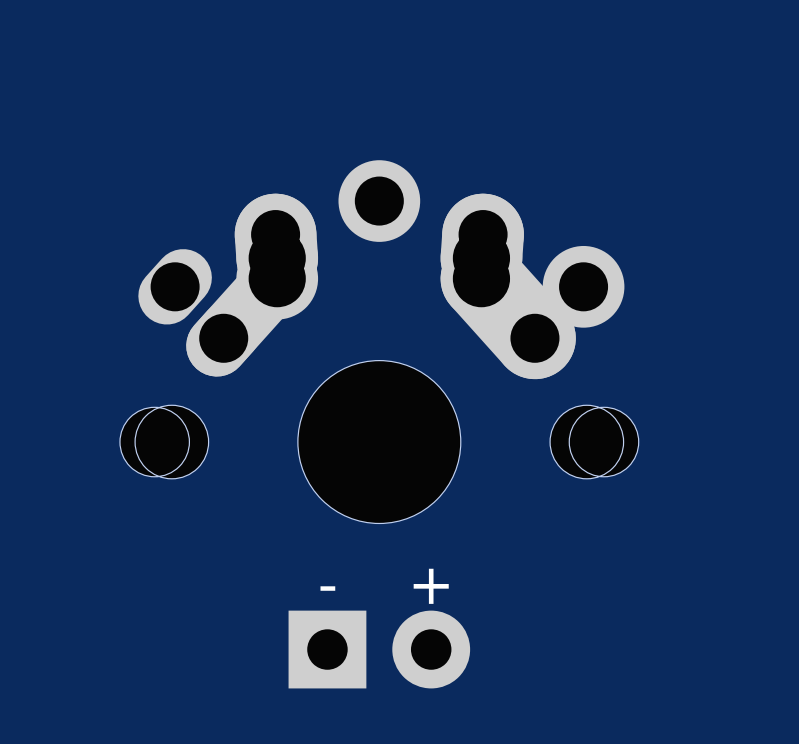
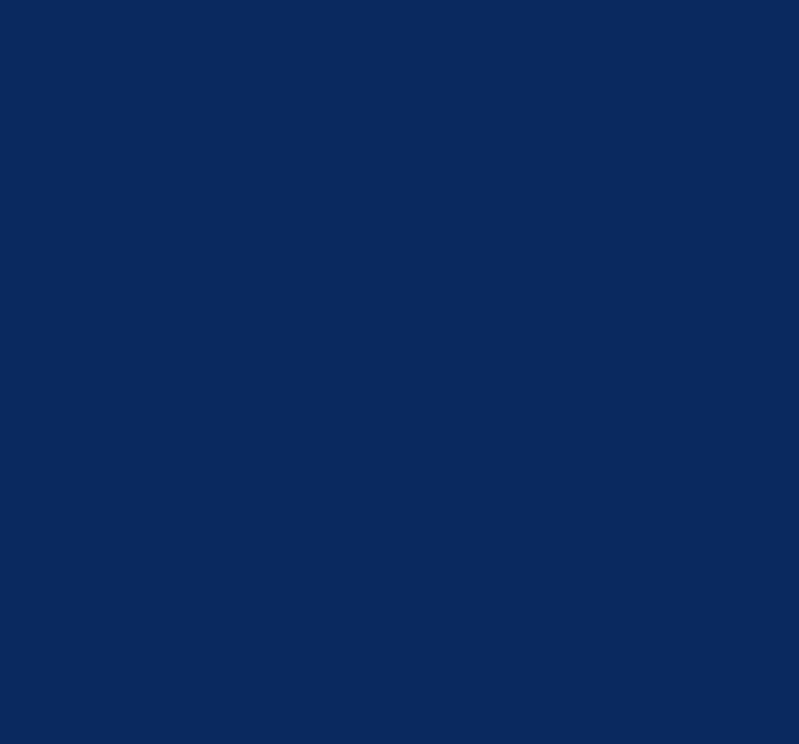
part: (379, 424) -> none

